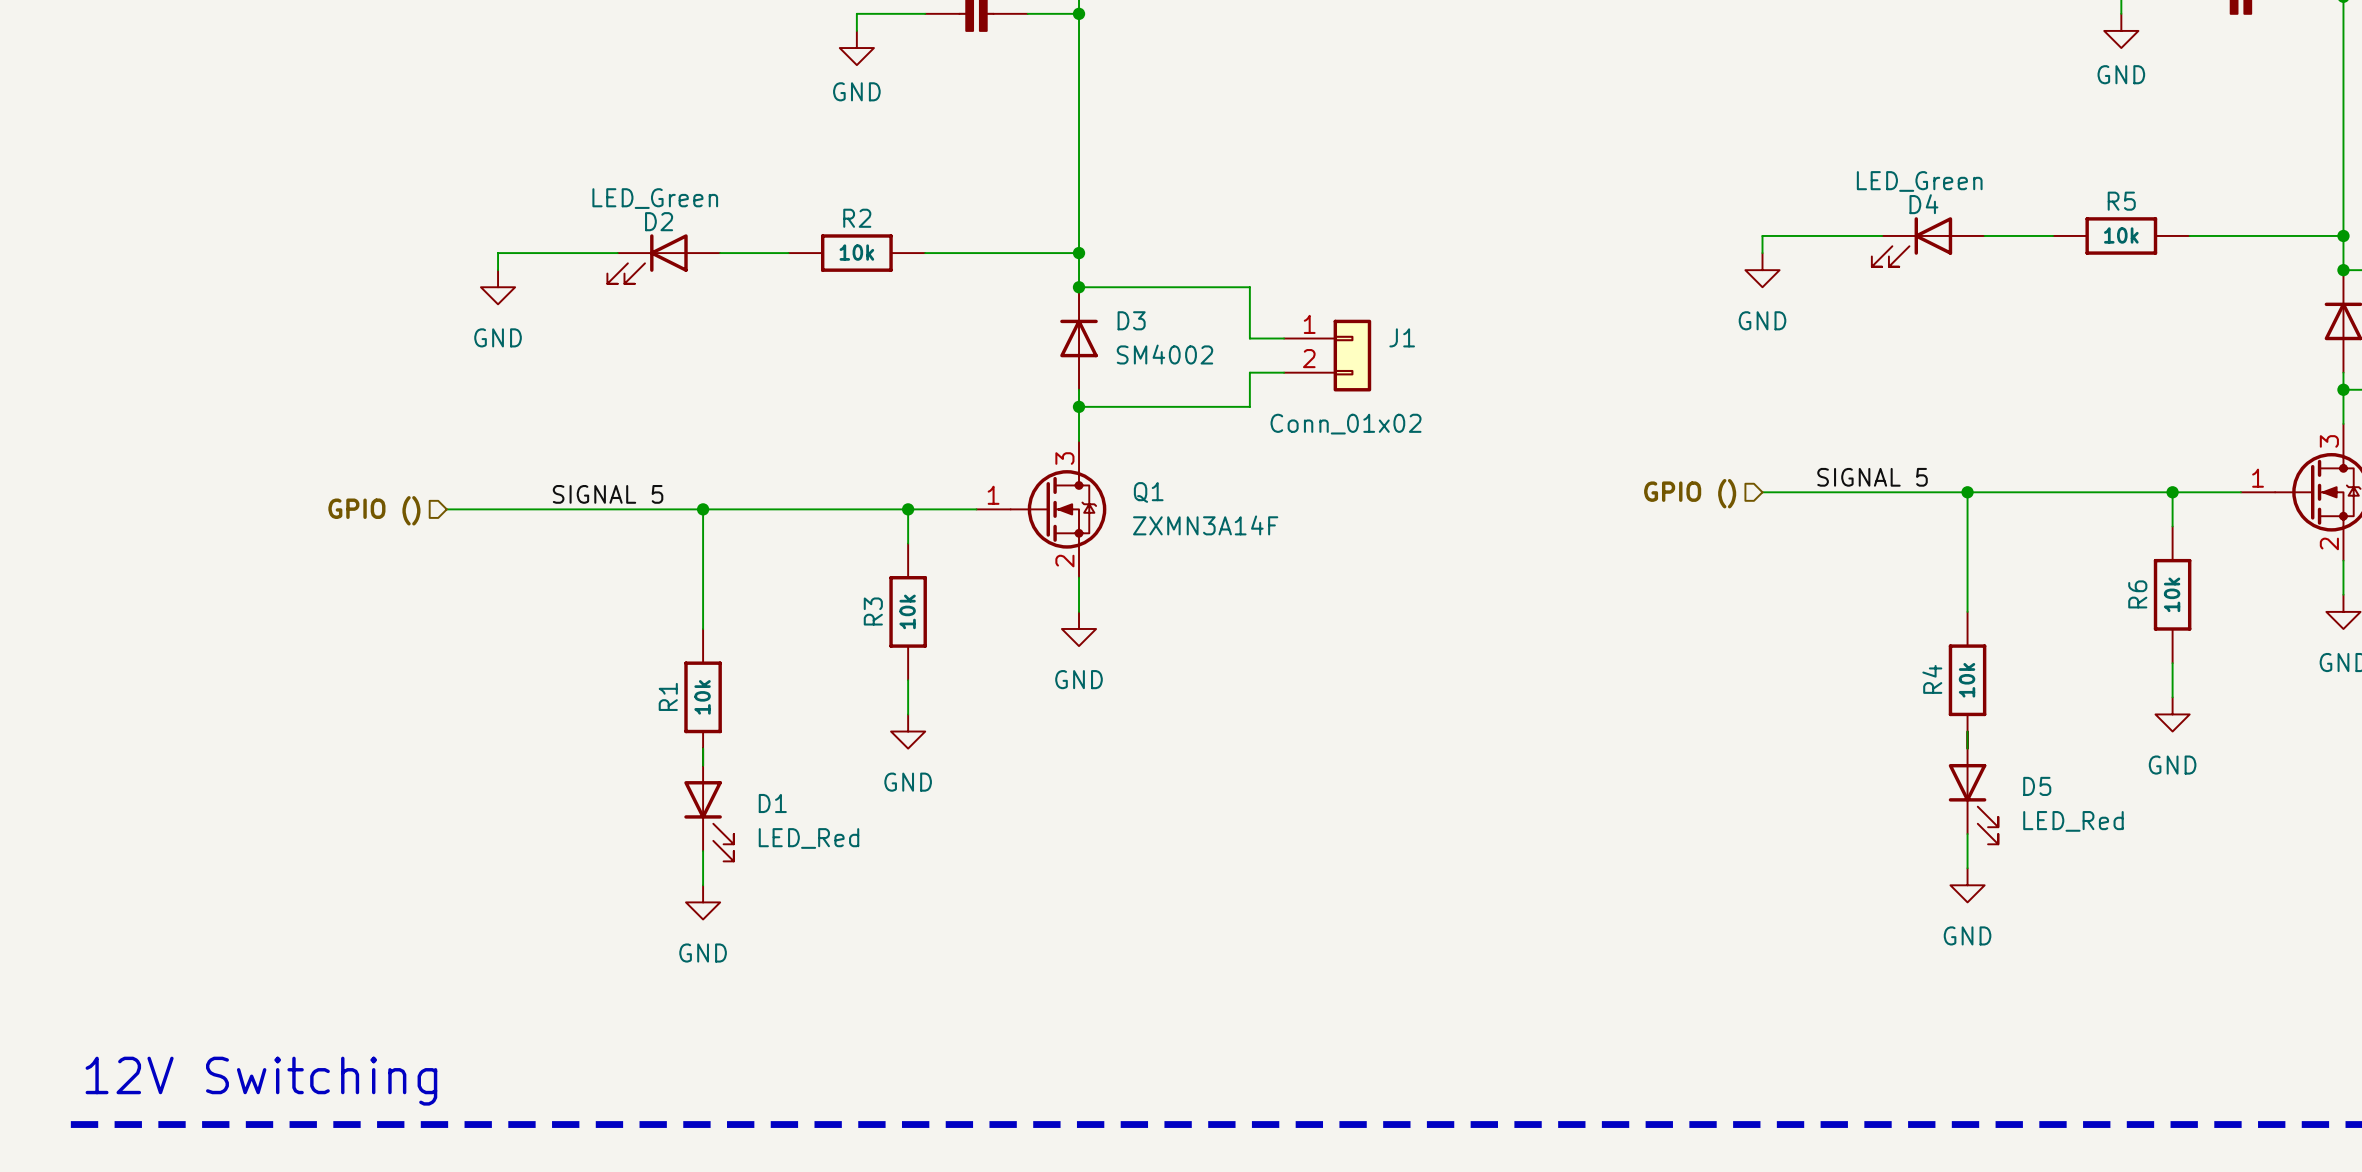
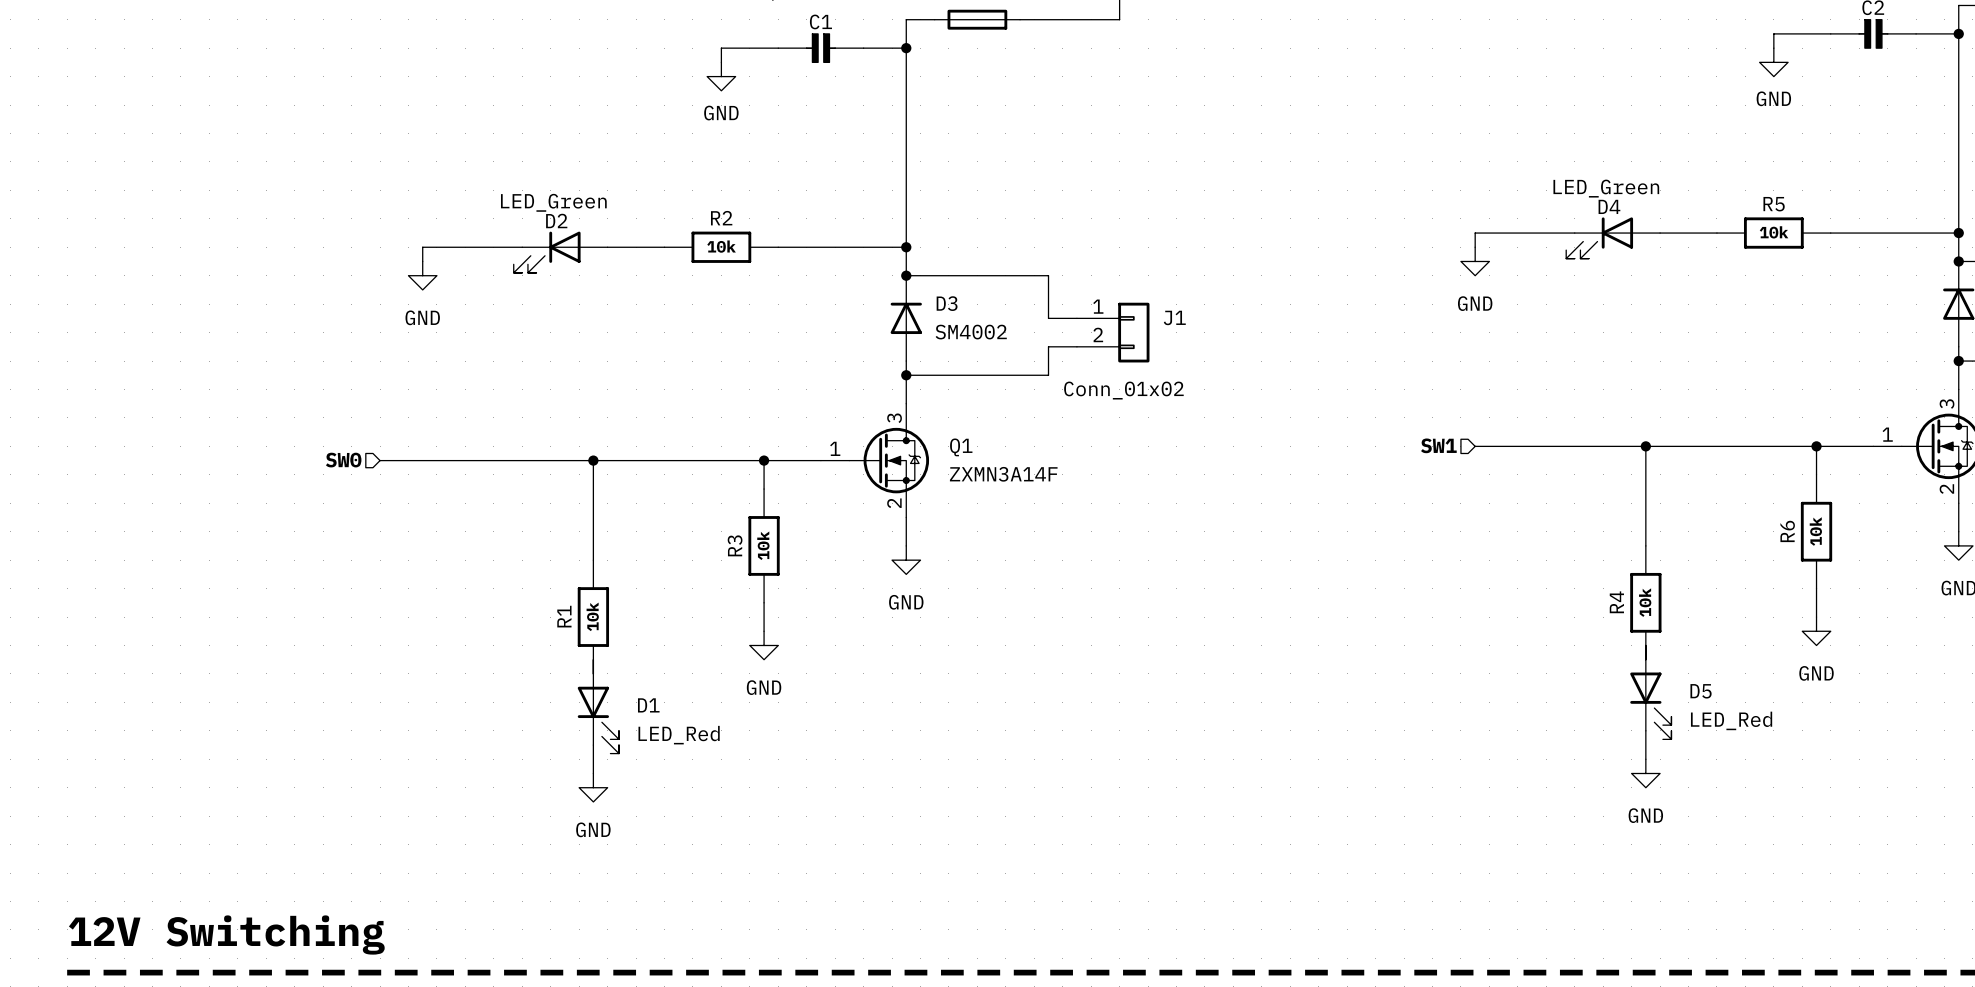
label: SIGNAL 5 (1872, 477) -> none
hierarchical label: GPIO () (1690, 493) -> SW1 (1438, 445)
label: SIGNAL 5 (608, 494) -> none
hierarchical label: GPIO () (374, 510) -> SW0 (343, 460)

